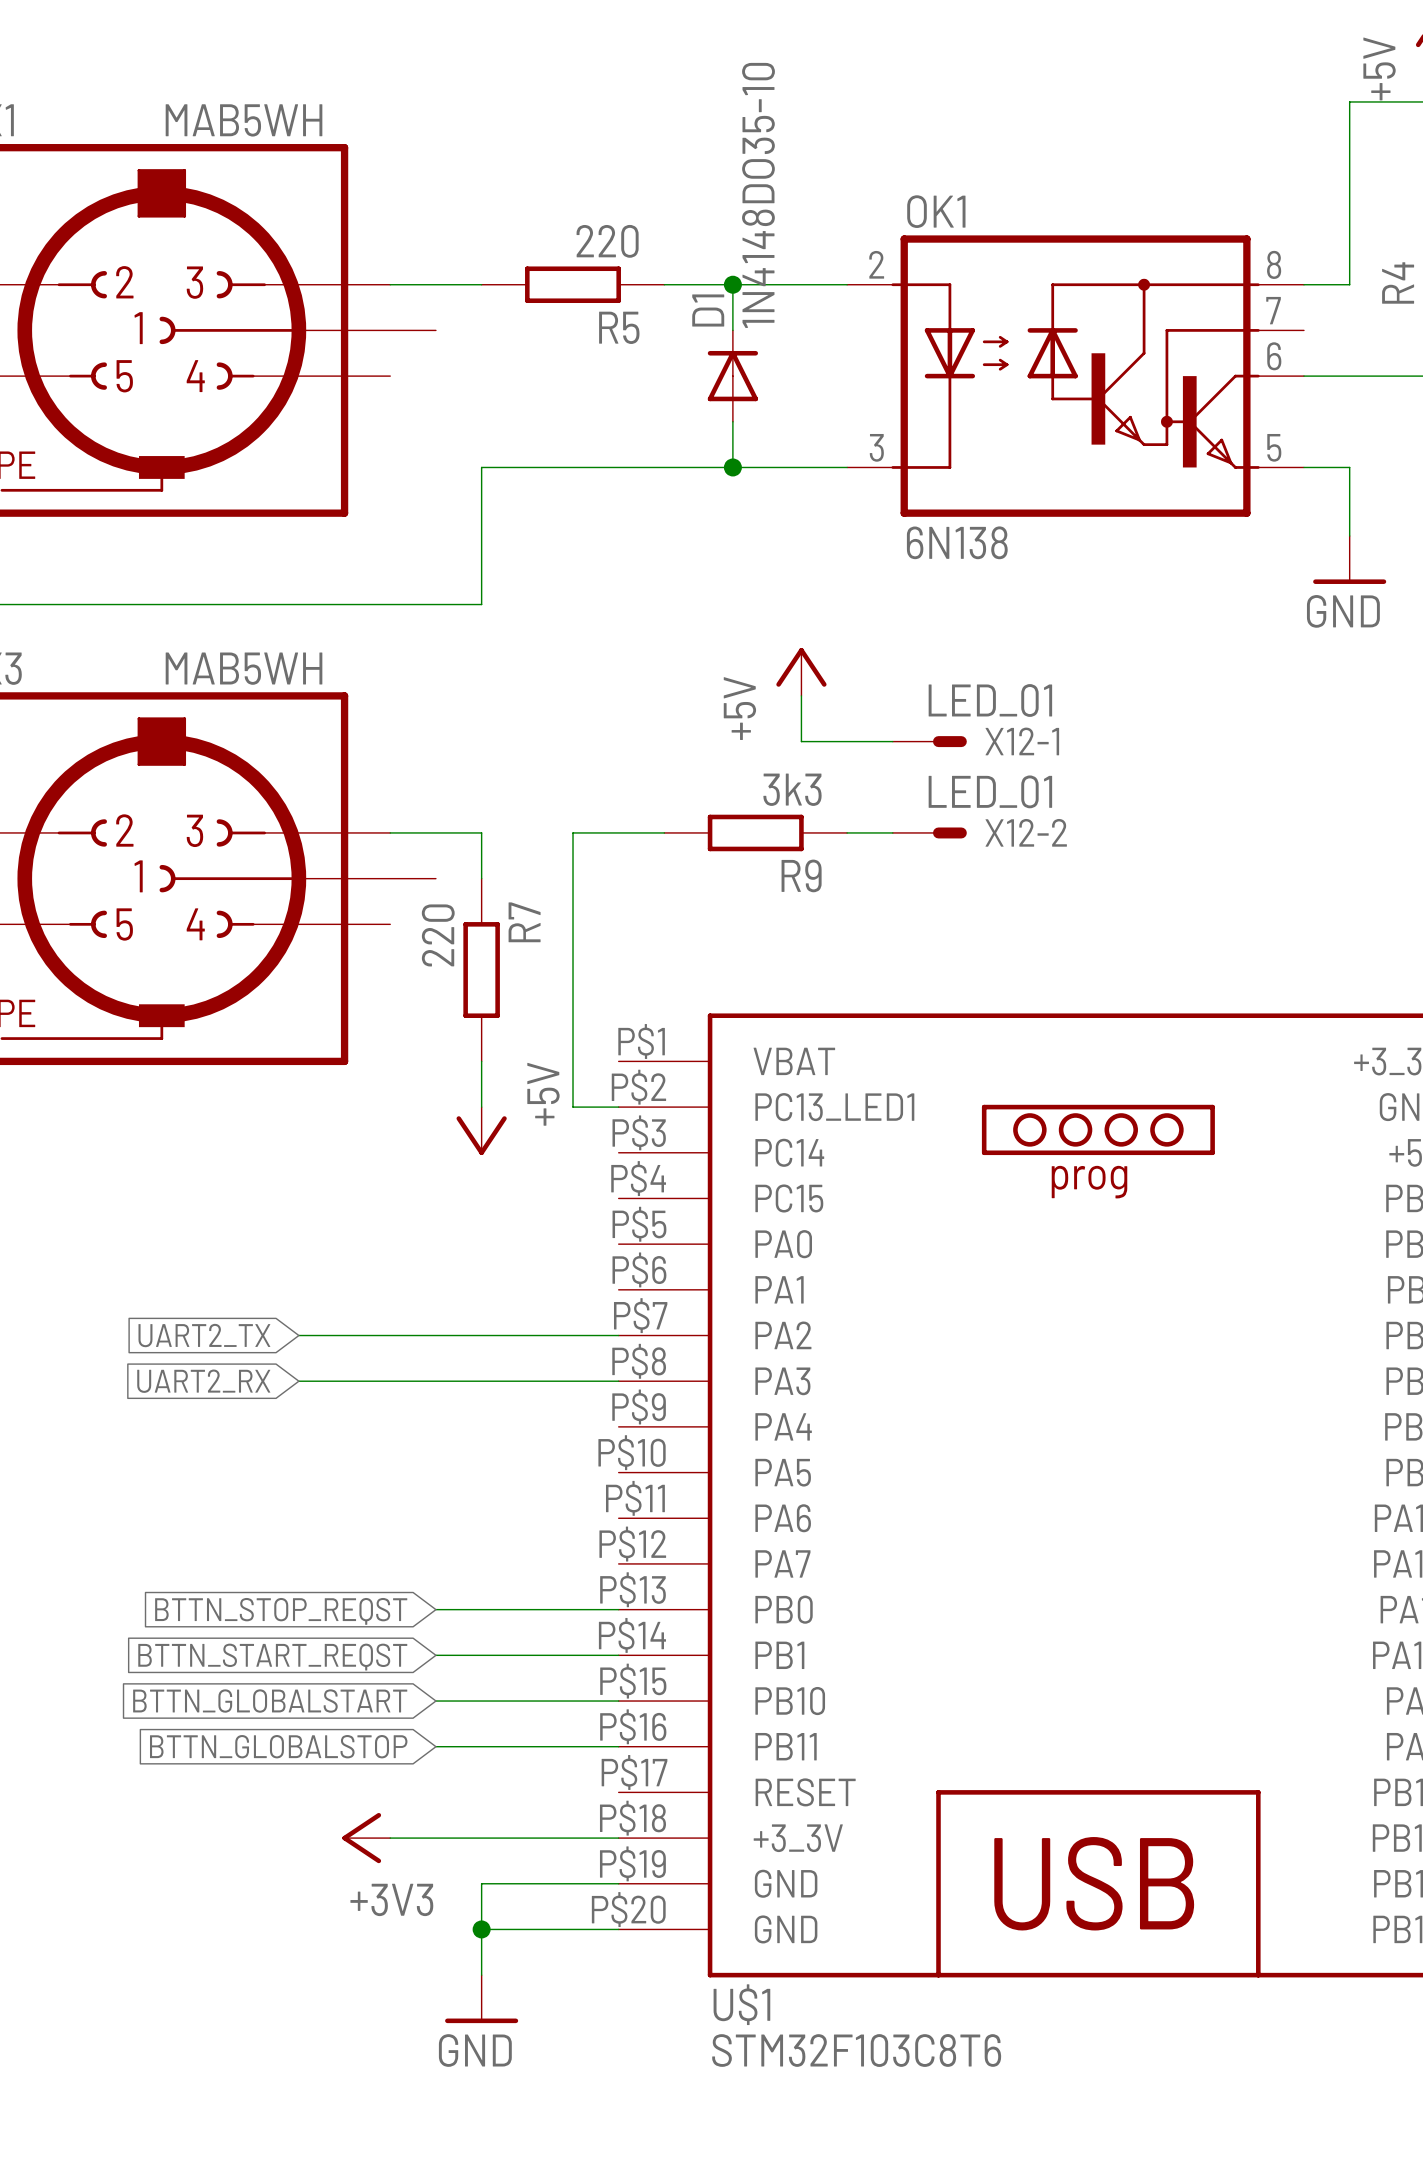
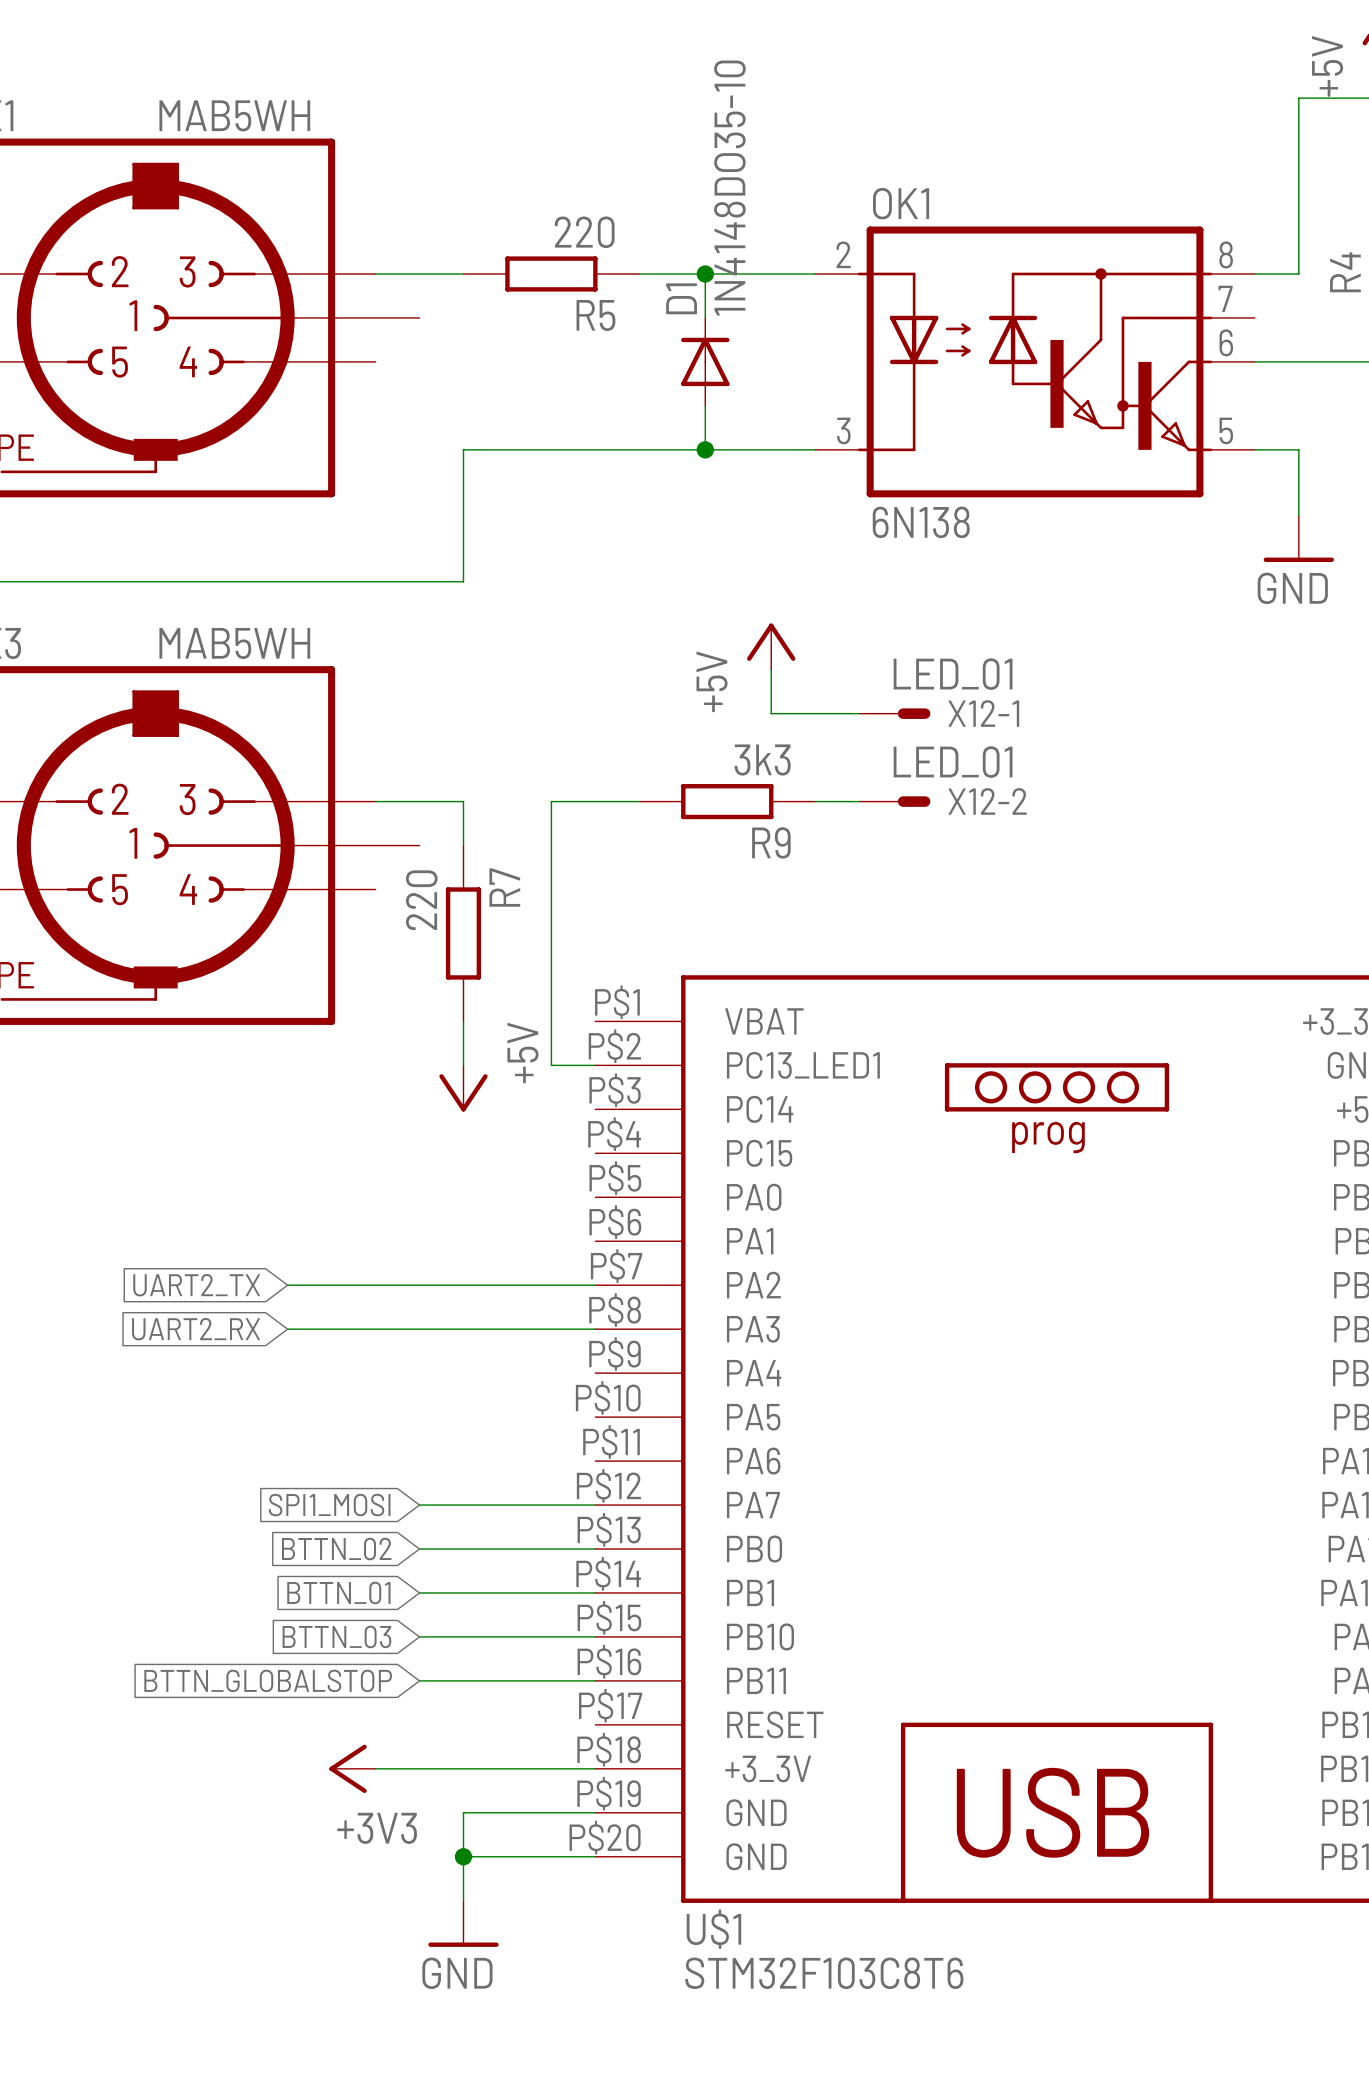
global label: none -> SPI1_MOSI (329, 1505)
wire: none -> (419, 1505) (595, 1505)
global label: BTTN_STOP_REQST (281, 1611) -> BTTN_02 (336, 1549)
global label: BTTN_START_REQST (272, 1657) -> BTTN_01 (338, 1592)
global label: BTTN_GLOBALSTART (270, 1701) -> BTTN_03 (336, 1636)

